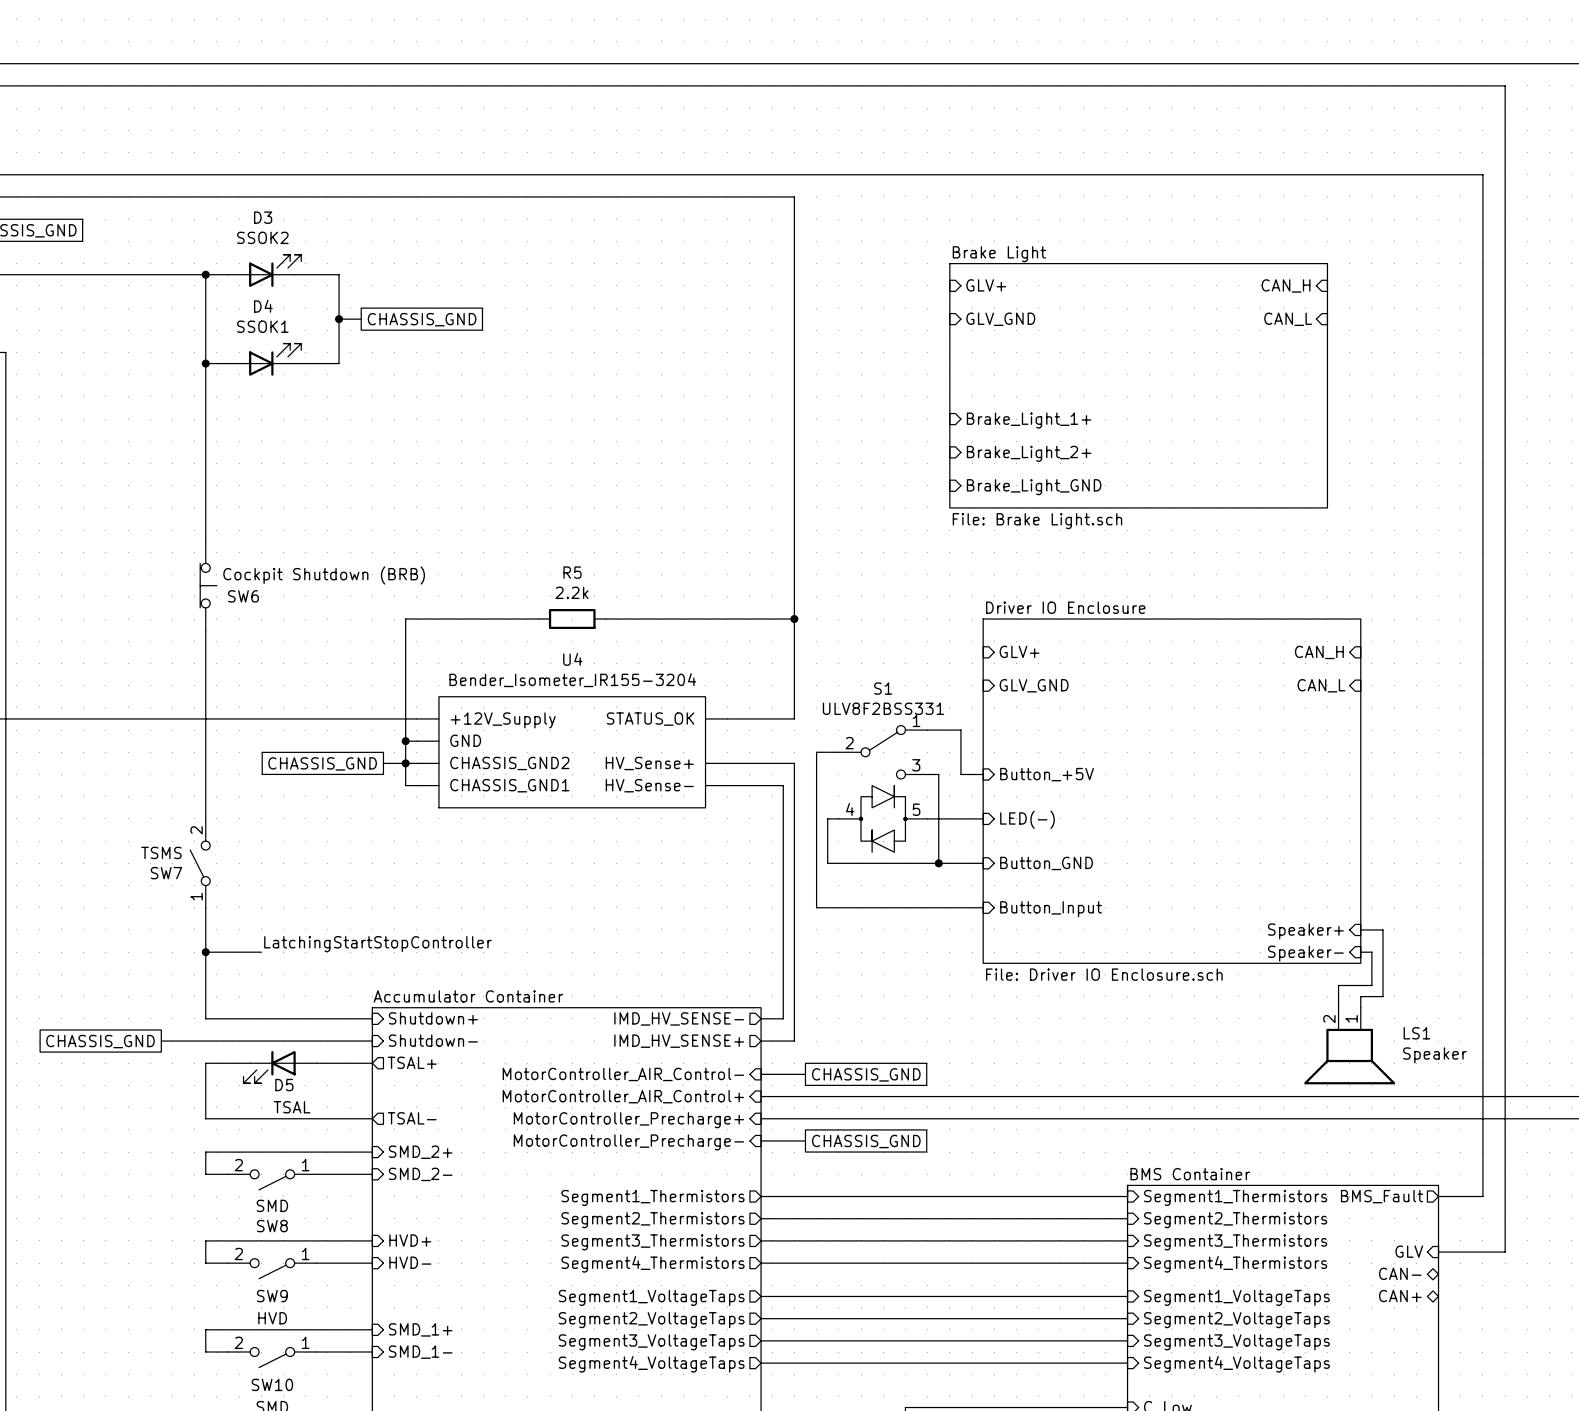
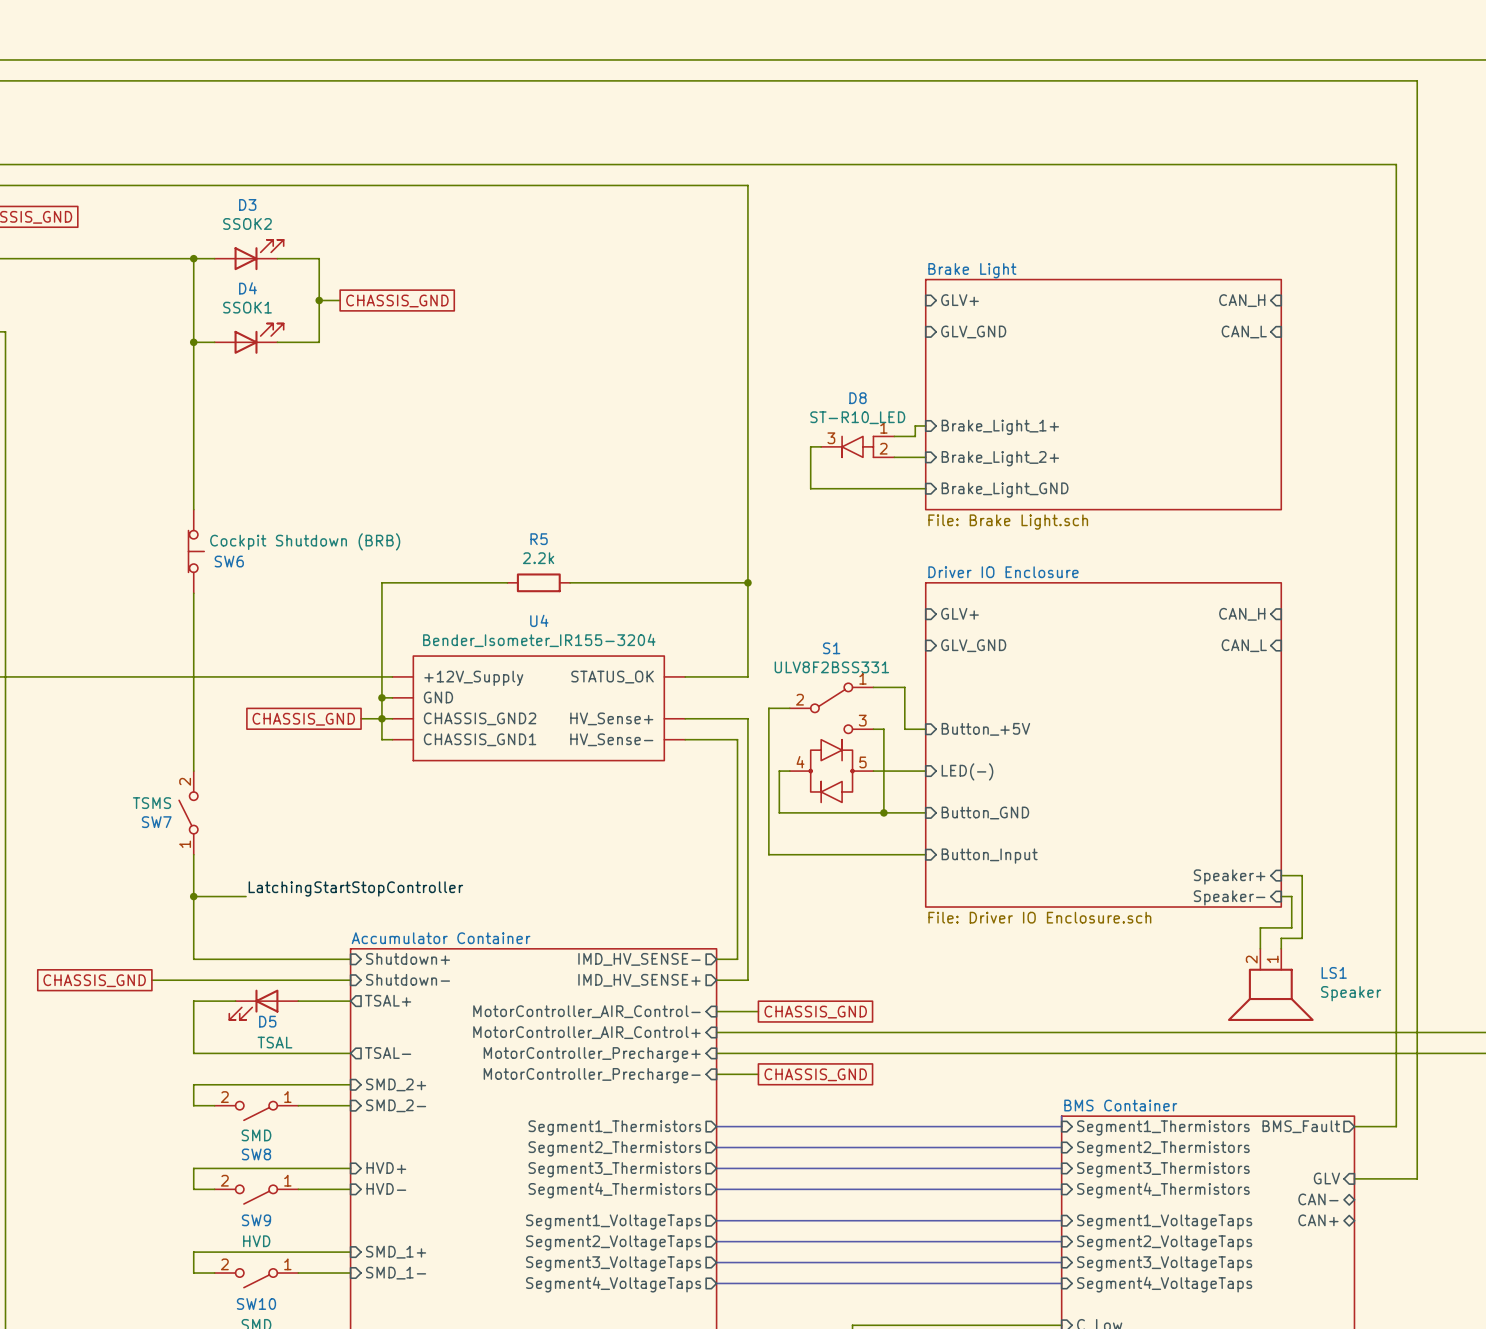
sheet pin position: GLV+ (986, 285) -> GLV+ (960, 300)
sheet pin position: CAN_H (1286, 285) -> CAN_H (1242, 300)
sheet pin position: GLV_GND (1000, 319) -> GLV_GND (973, 331)
sheet pin position: CAN_L (1288, 319) -> CAN_L (1244, 331)
sheet Brake Light position: (1138, 385) -> (1103, 394)
sheet pin position: Brake_Light_1+ (1029, 420) -> Brake_Light_1+ (1000, 427)
wire: none -> (925, 425) (915, 425) (915, 436) (894, 436)
sheet pin position: Brake_Light_2+ (1029, 453) -> Brake_Light_2+ (1000, 458)
wire: none -> (821, 446) (810, 446) (810, 488) (925, 488)
D8: none -> ST-R10_LED (857, 446)
wire: none -> (894, 457) (925, 457)
sheet pin position: Brake_Light_GND (1034, 487) -> Brake_Light_GND (1005, 490)

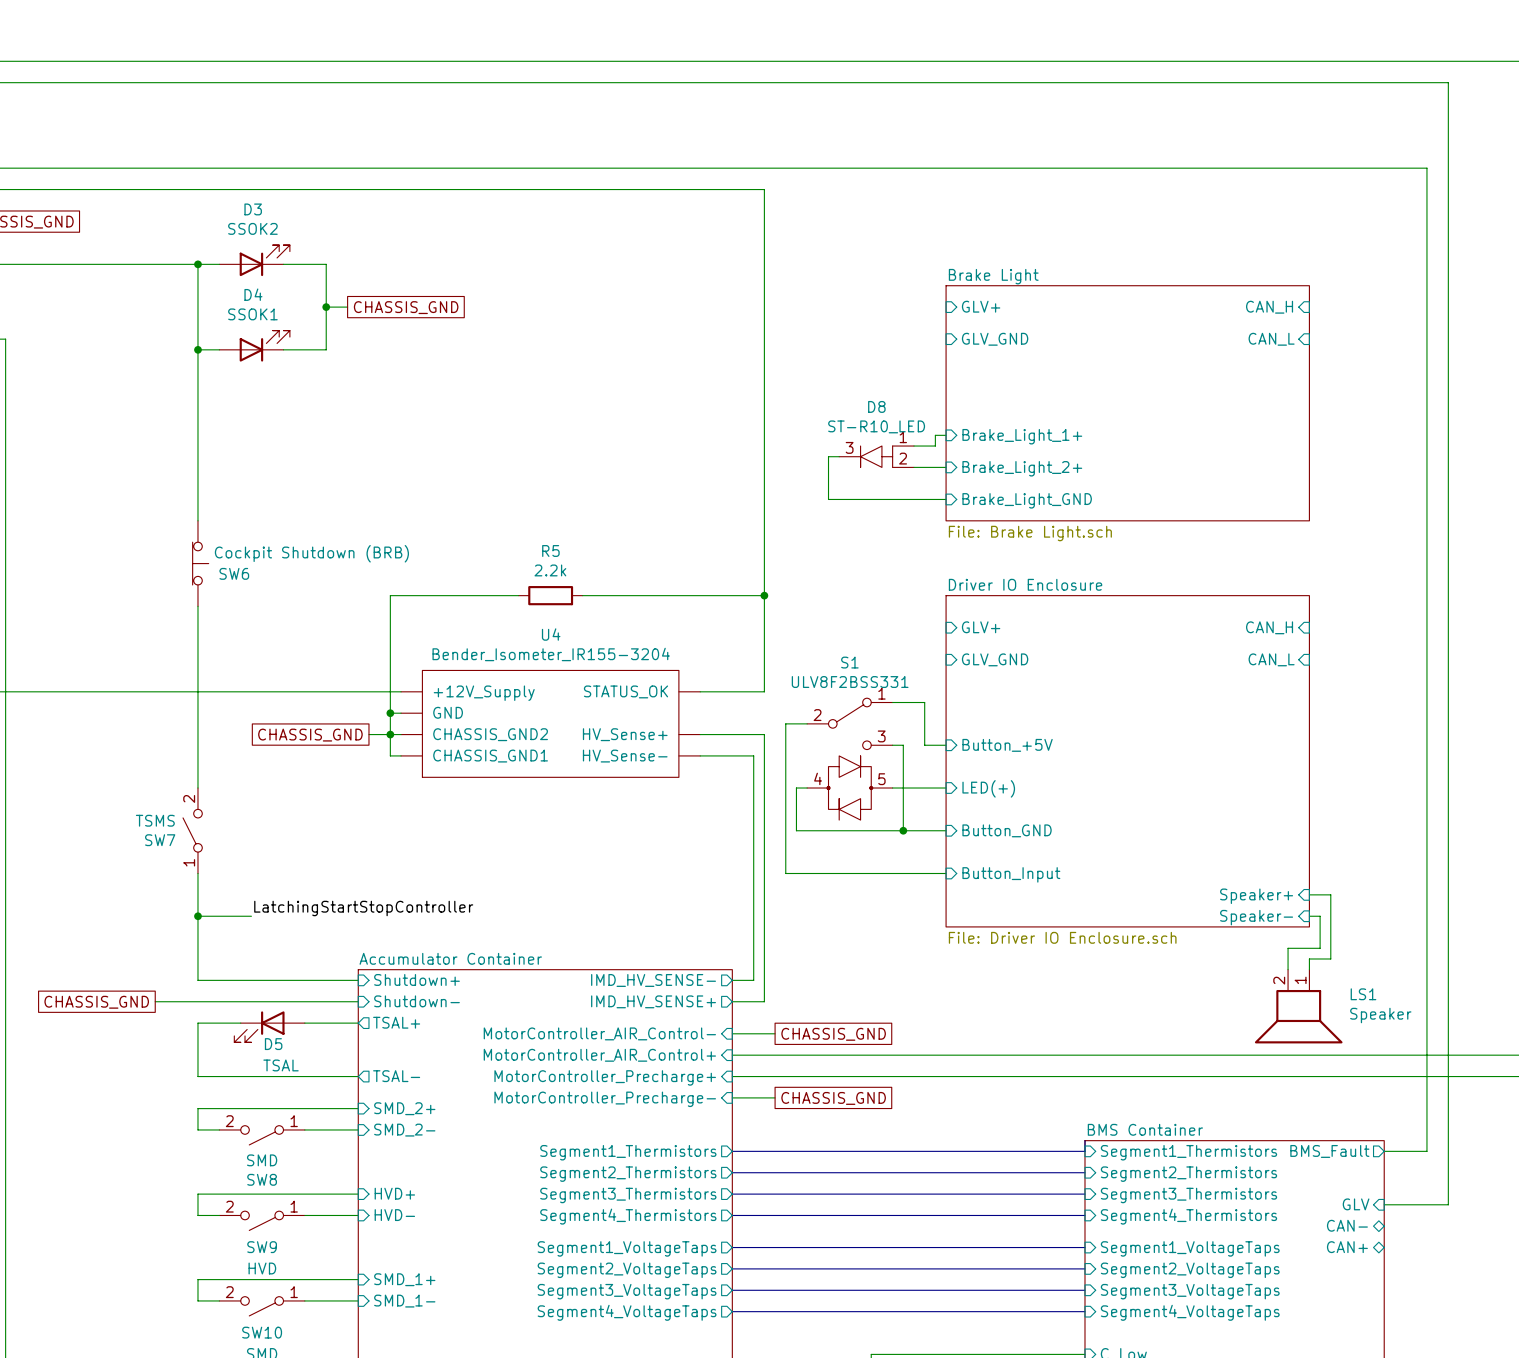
sheet pin: LED(-) (967, 771) -> LED(+) (988, 788)

